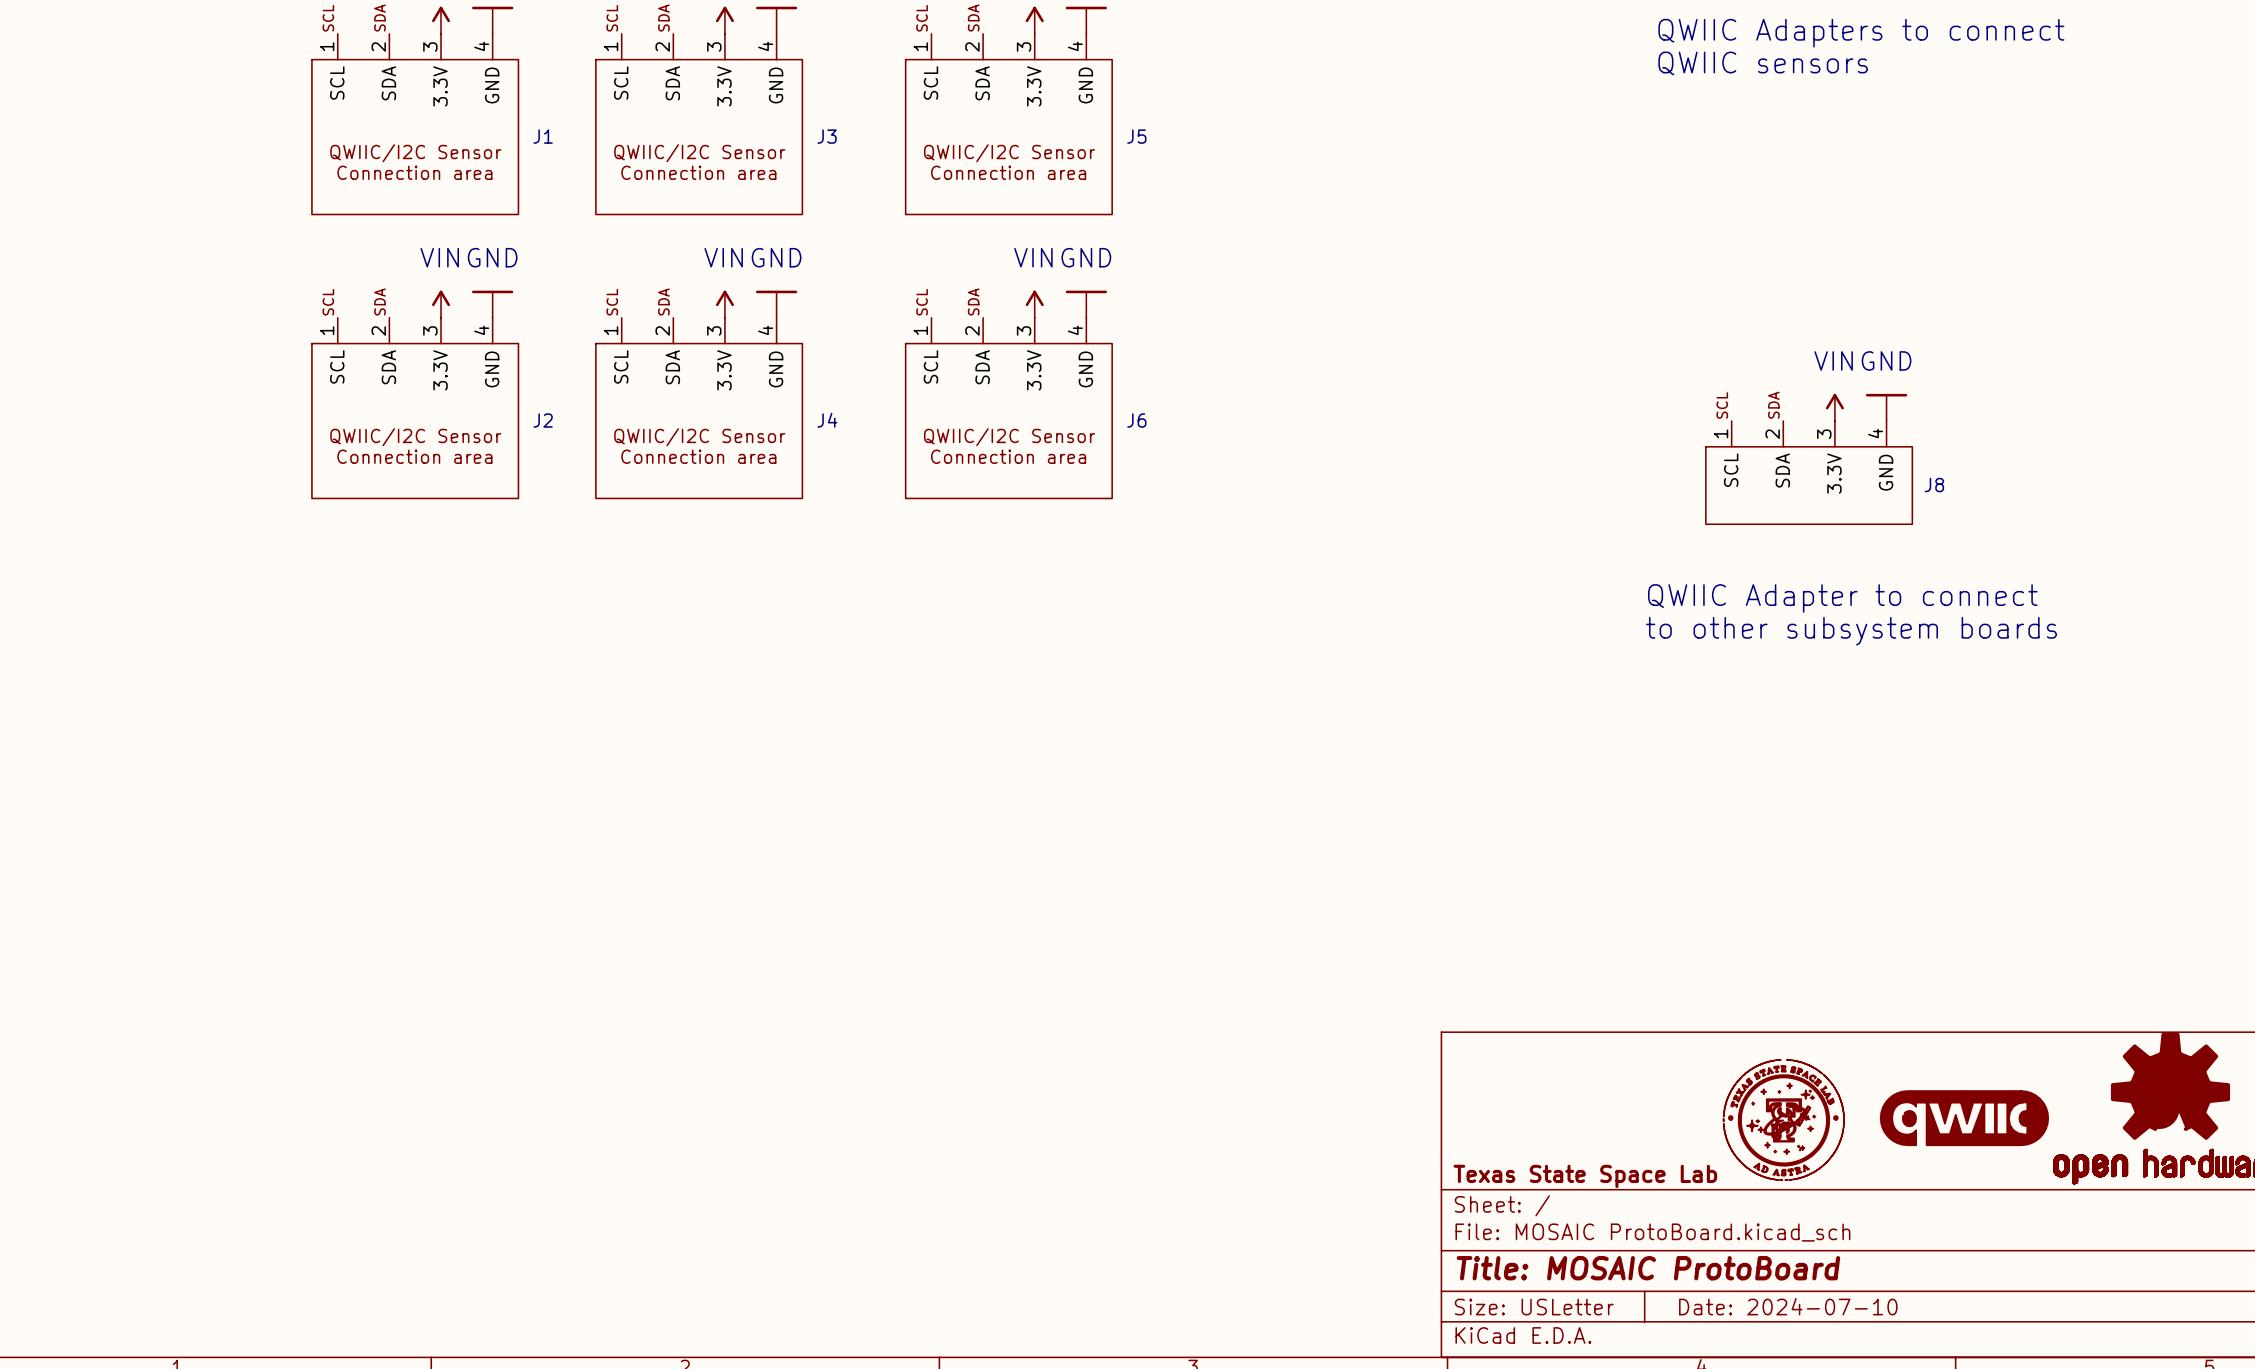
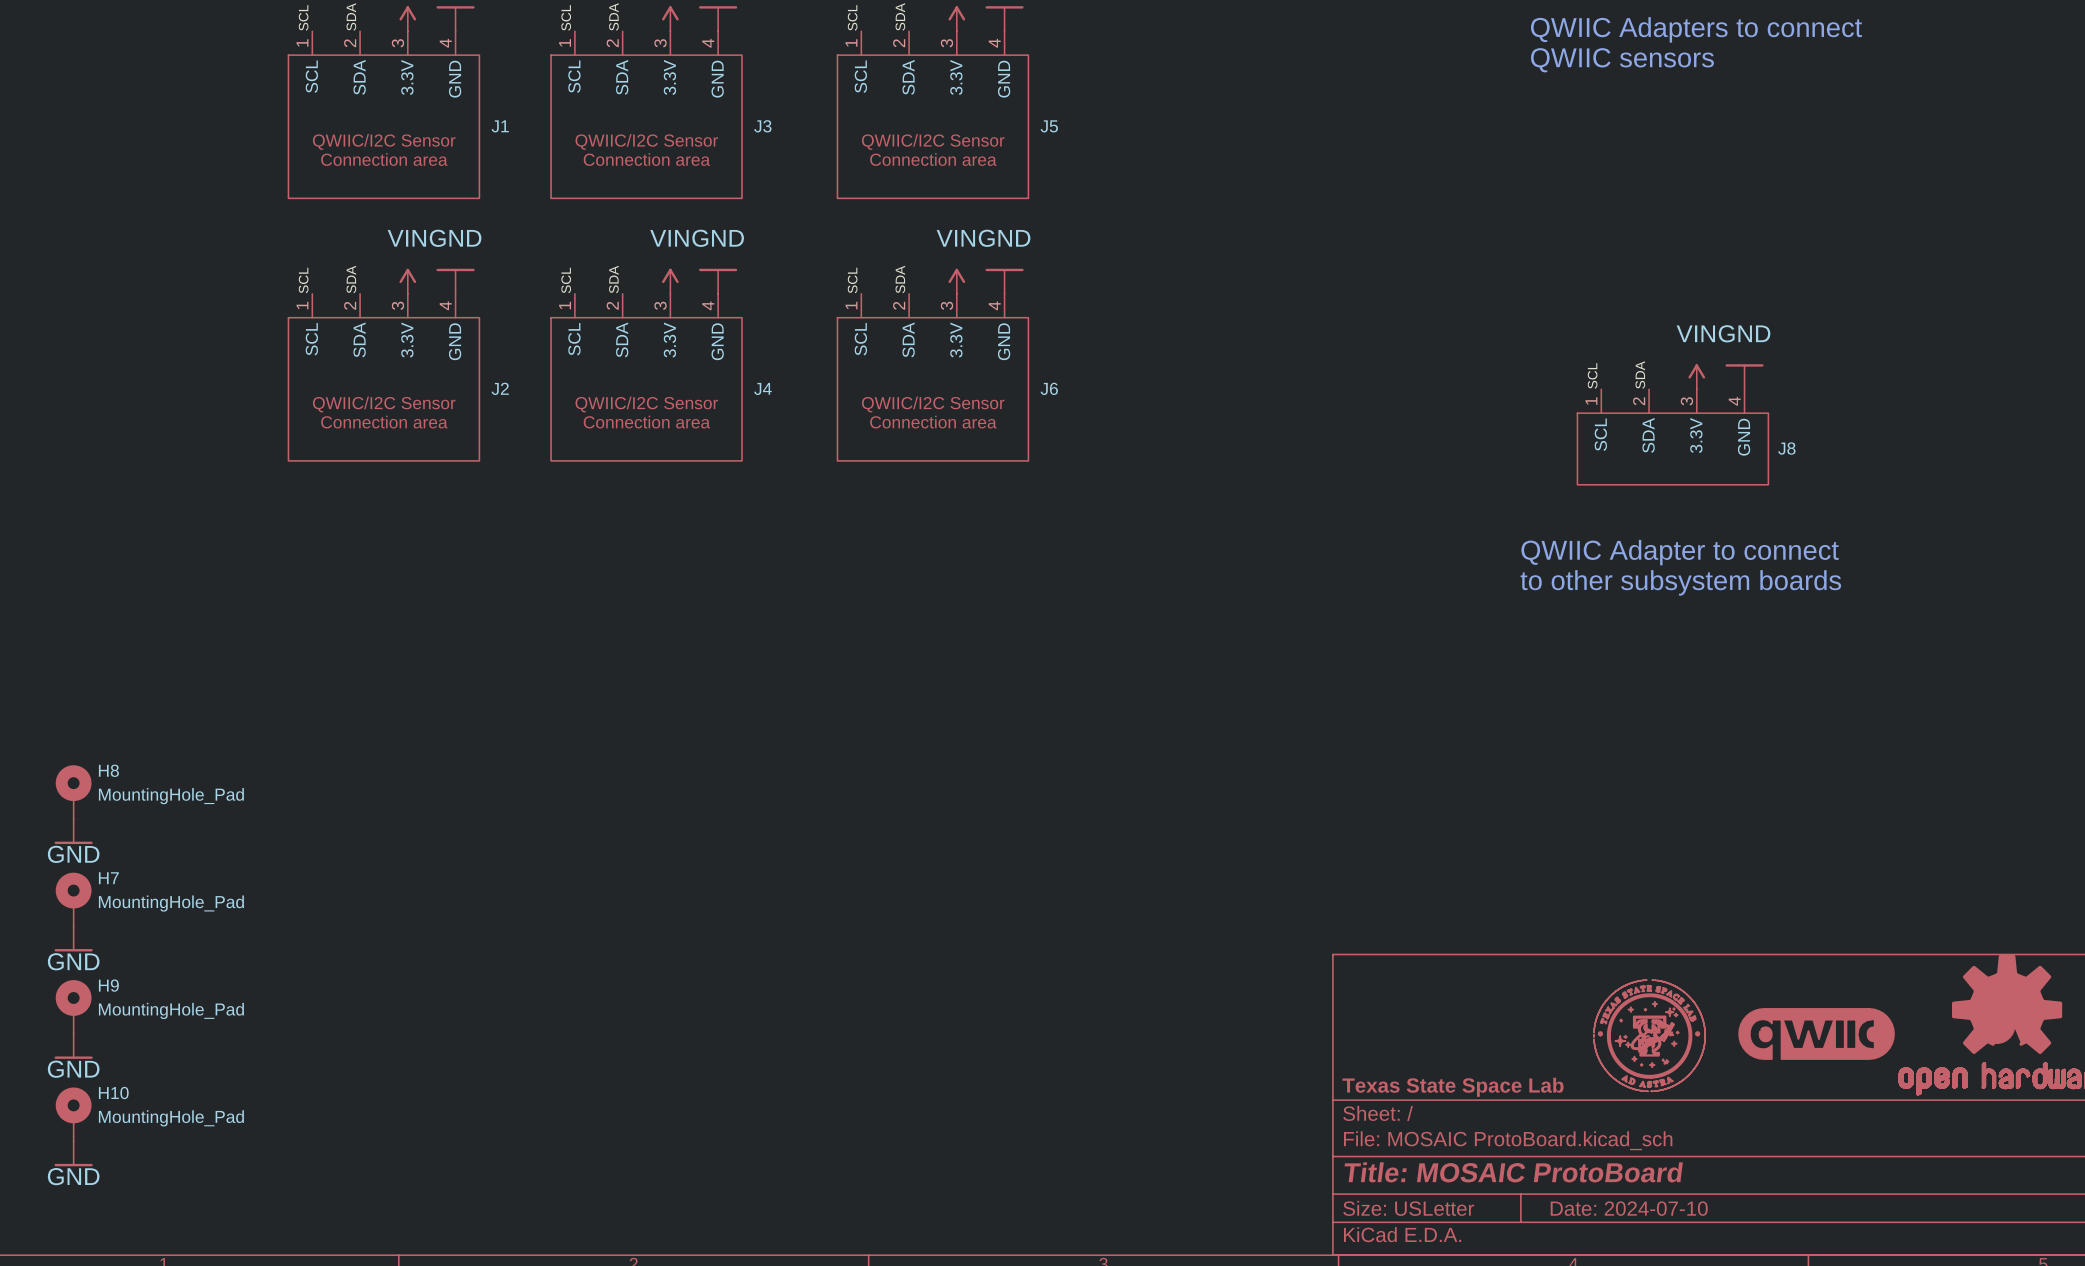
H8: none -> MountingHole_Pad (73, 792)
power symbol: none -> GND (73, 831)
H7: none -> MountingHole_Pad (73, 899)
power symbol: none -> GND (73, 938)
H9: none -> MountingHole_Pad (73, 1006)
power symbol: none -> GND (73, 1046)
H10: none -> MountingHole_Pad (73, 1114)
power symbol: none -> GND (73, 1153)

